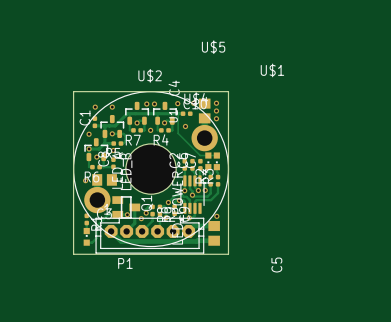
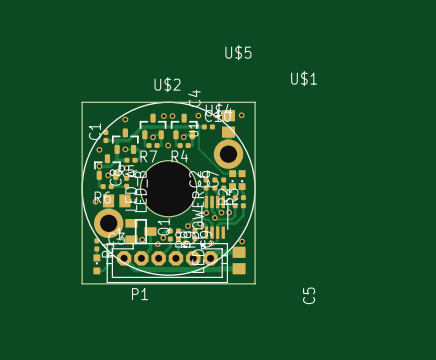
via: (95, 107) -> none
via: (216, 110) -> none
via: (216, 118) -> none
via: (185, 126) -> none

